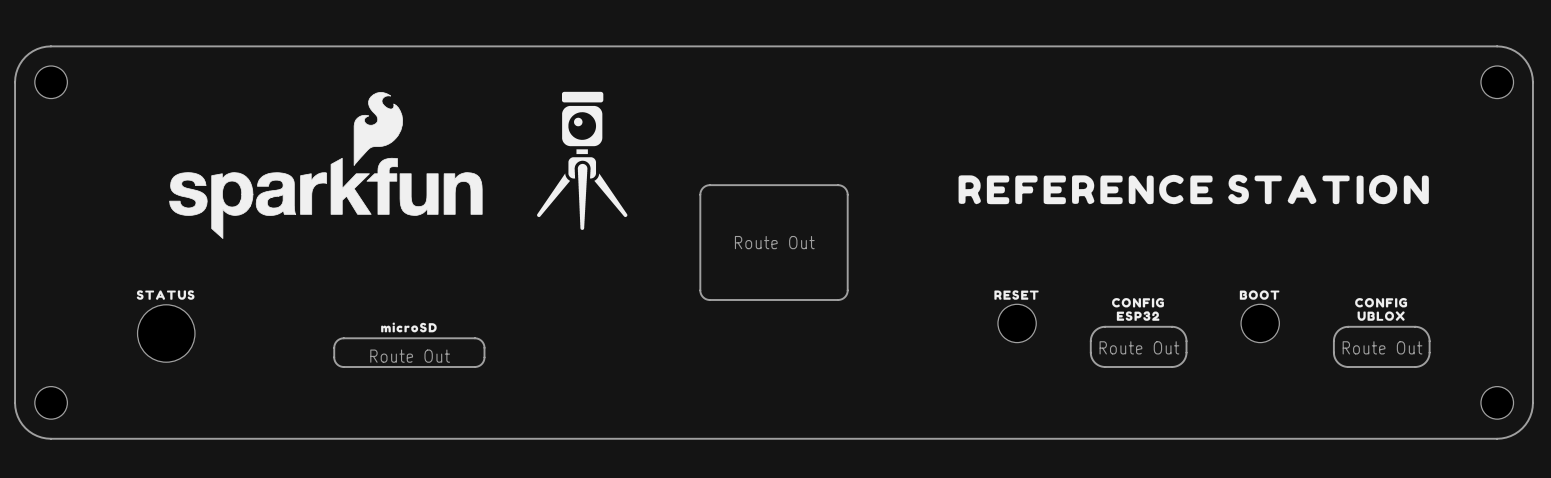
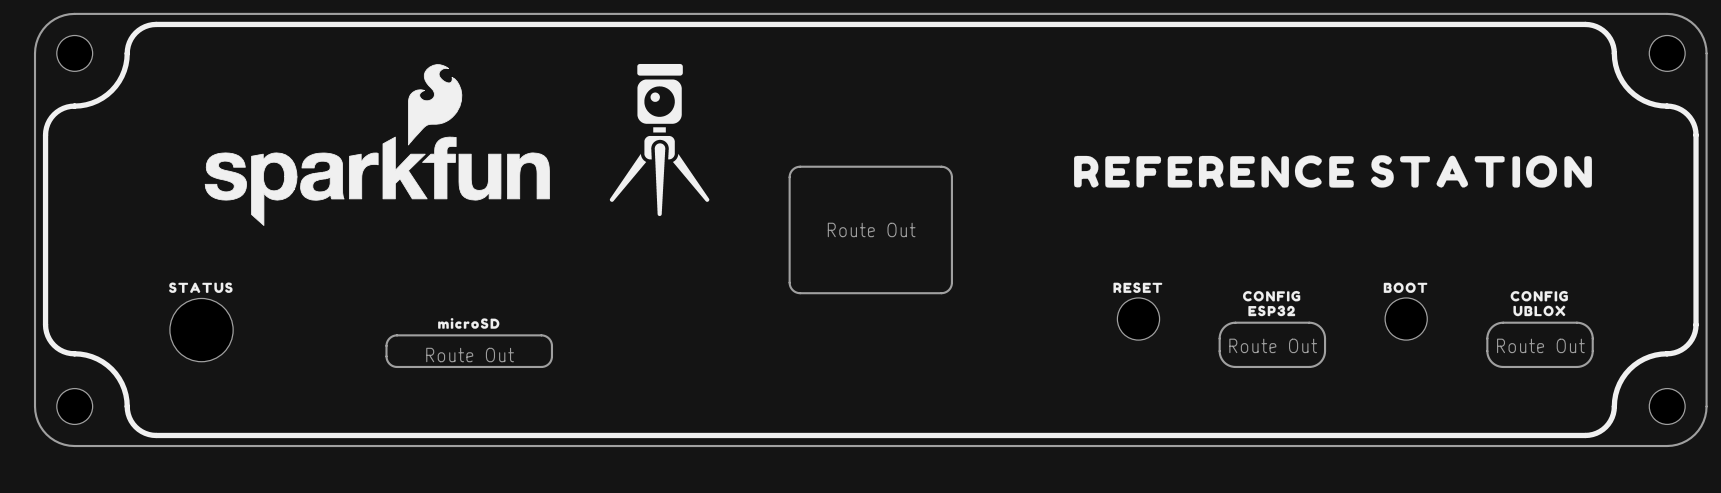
line: none -> (156, 24) (1589, 24) (1599, 28) (1610, 38) (1617, 70) (1629, 90) (1649, 103) (1681, 110) (1693, 124) (1696, 135) (1695, 328) (1692, 339) (1681, 349) (1649, 356) (1629, 369) (1617, 389) (1610, 420) (1599, 431) (1589, 435) (152, 435) (141, 431) (131, 420) (124, 389) (111, 369) (91, 356) (60, 349) (47, 335) (45, 324) (45, 135) (47, 124) (56, 112) (67, 107) (91, 103) (111, 90) (124, 70) (128, 45) (133, 35) (145, 26) (156, 24)

